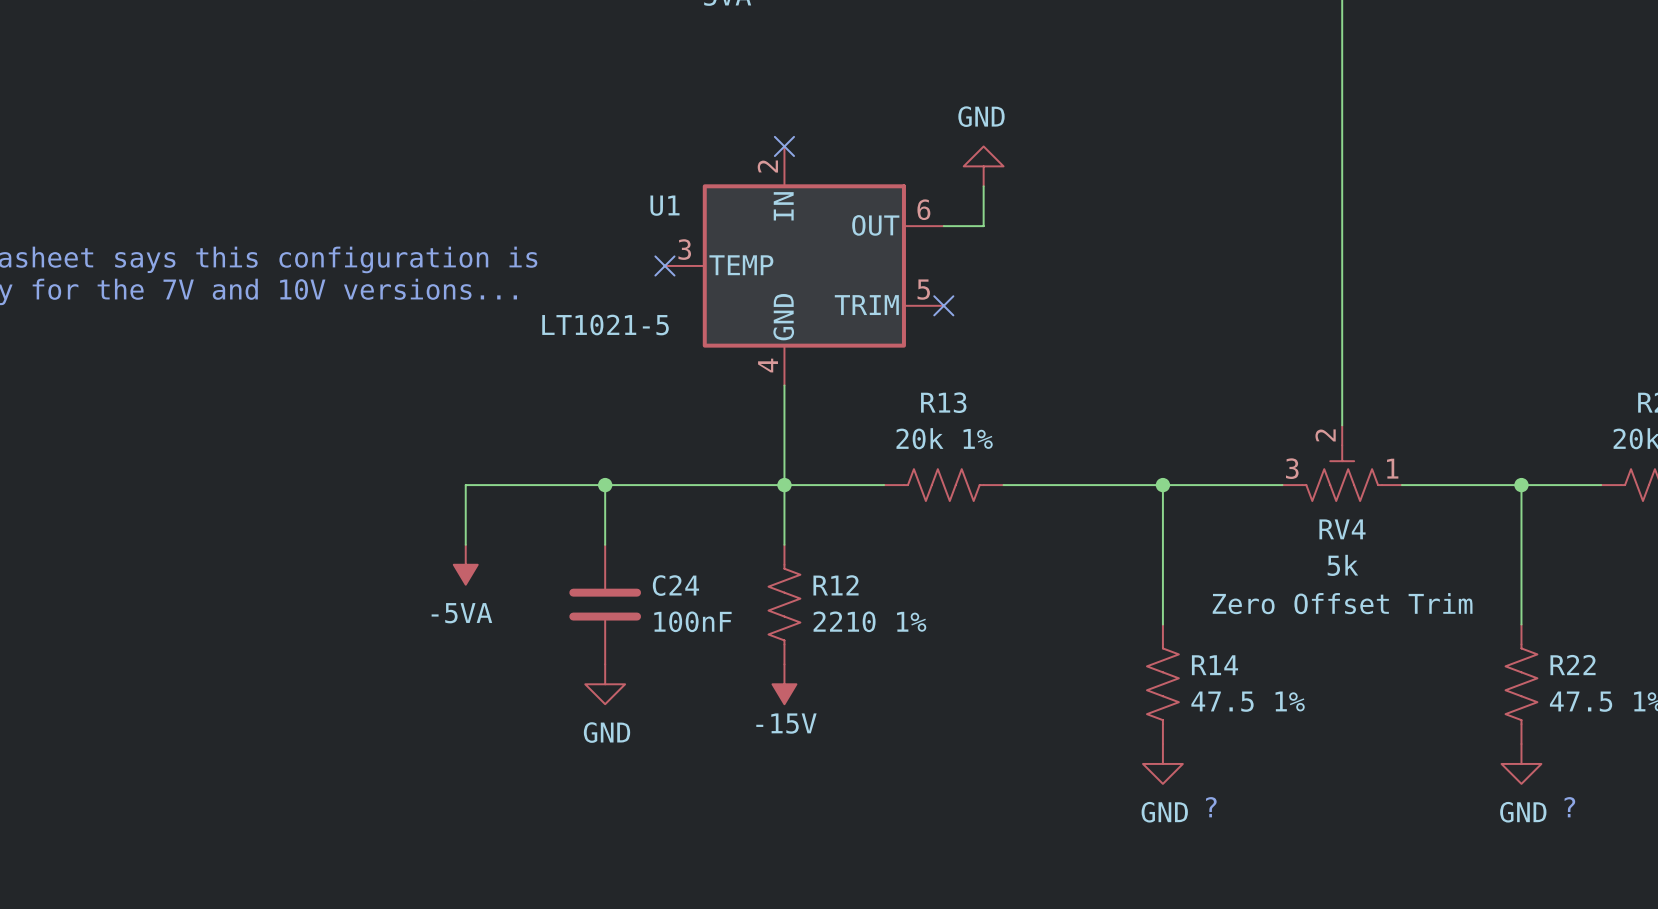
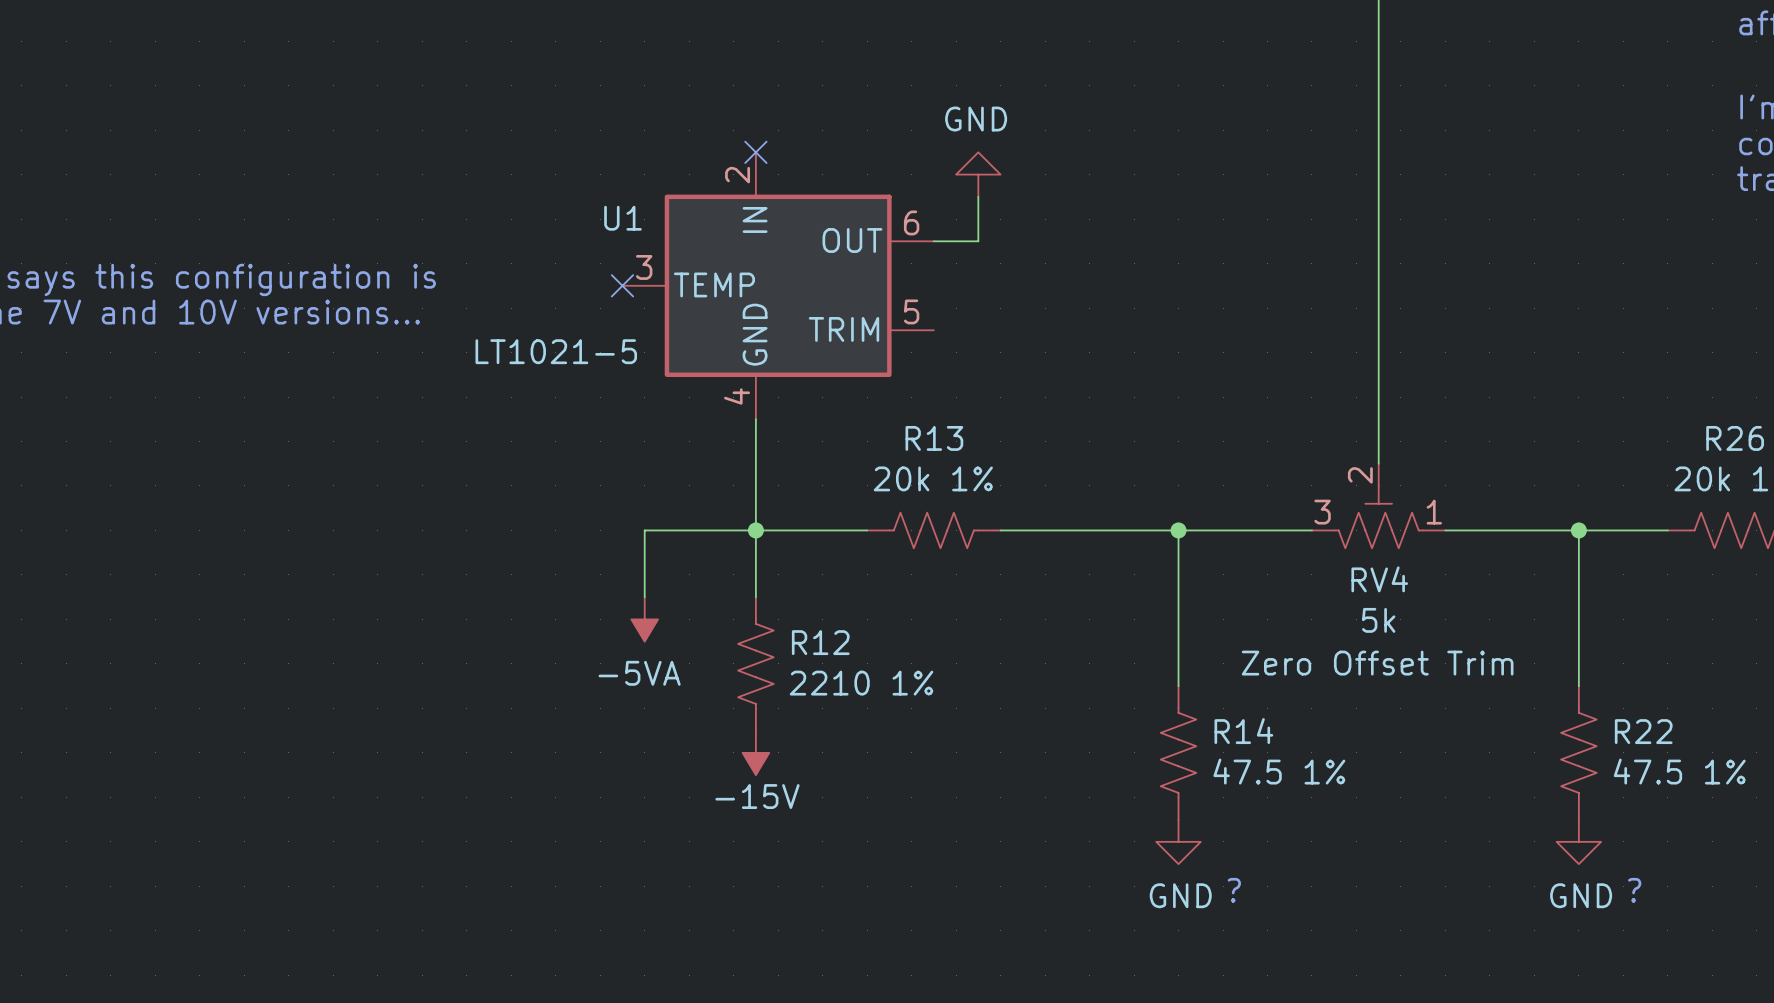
no-connect mark: (943, 305) -> none
wire: (605, 485) (605, 544) -> none
junction: (605, 485) -> none
wire: (684, 485) (465, 485) (465, 544) -> (644, 530) (644, 597)
power symbol position: -5VA (465, 564) -> -5VA (644, 619)
C24: 100nF (605, 604) -> none
power symbol: GND (605, 684) -> none

